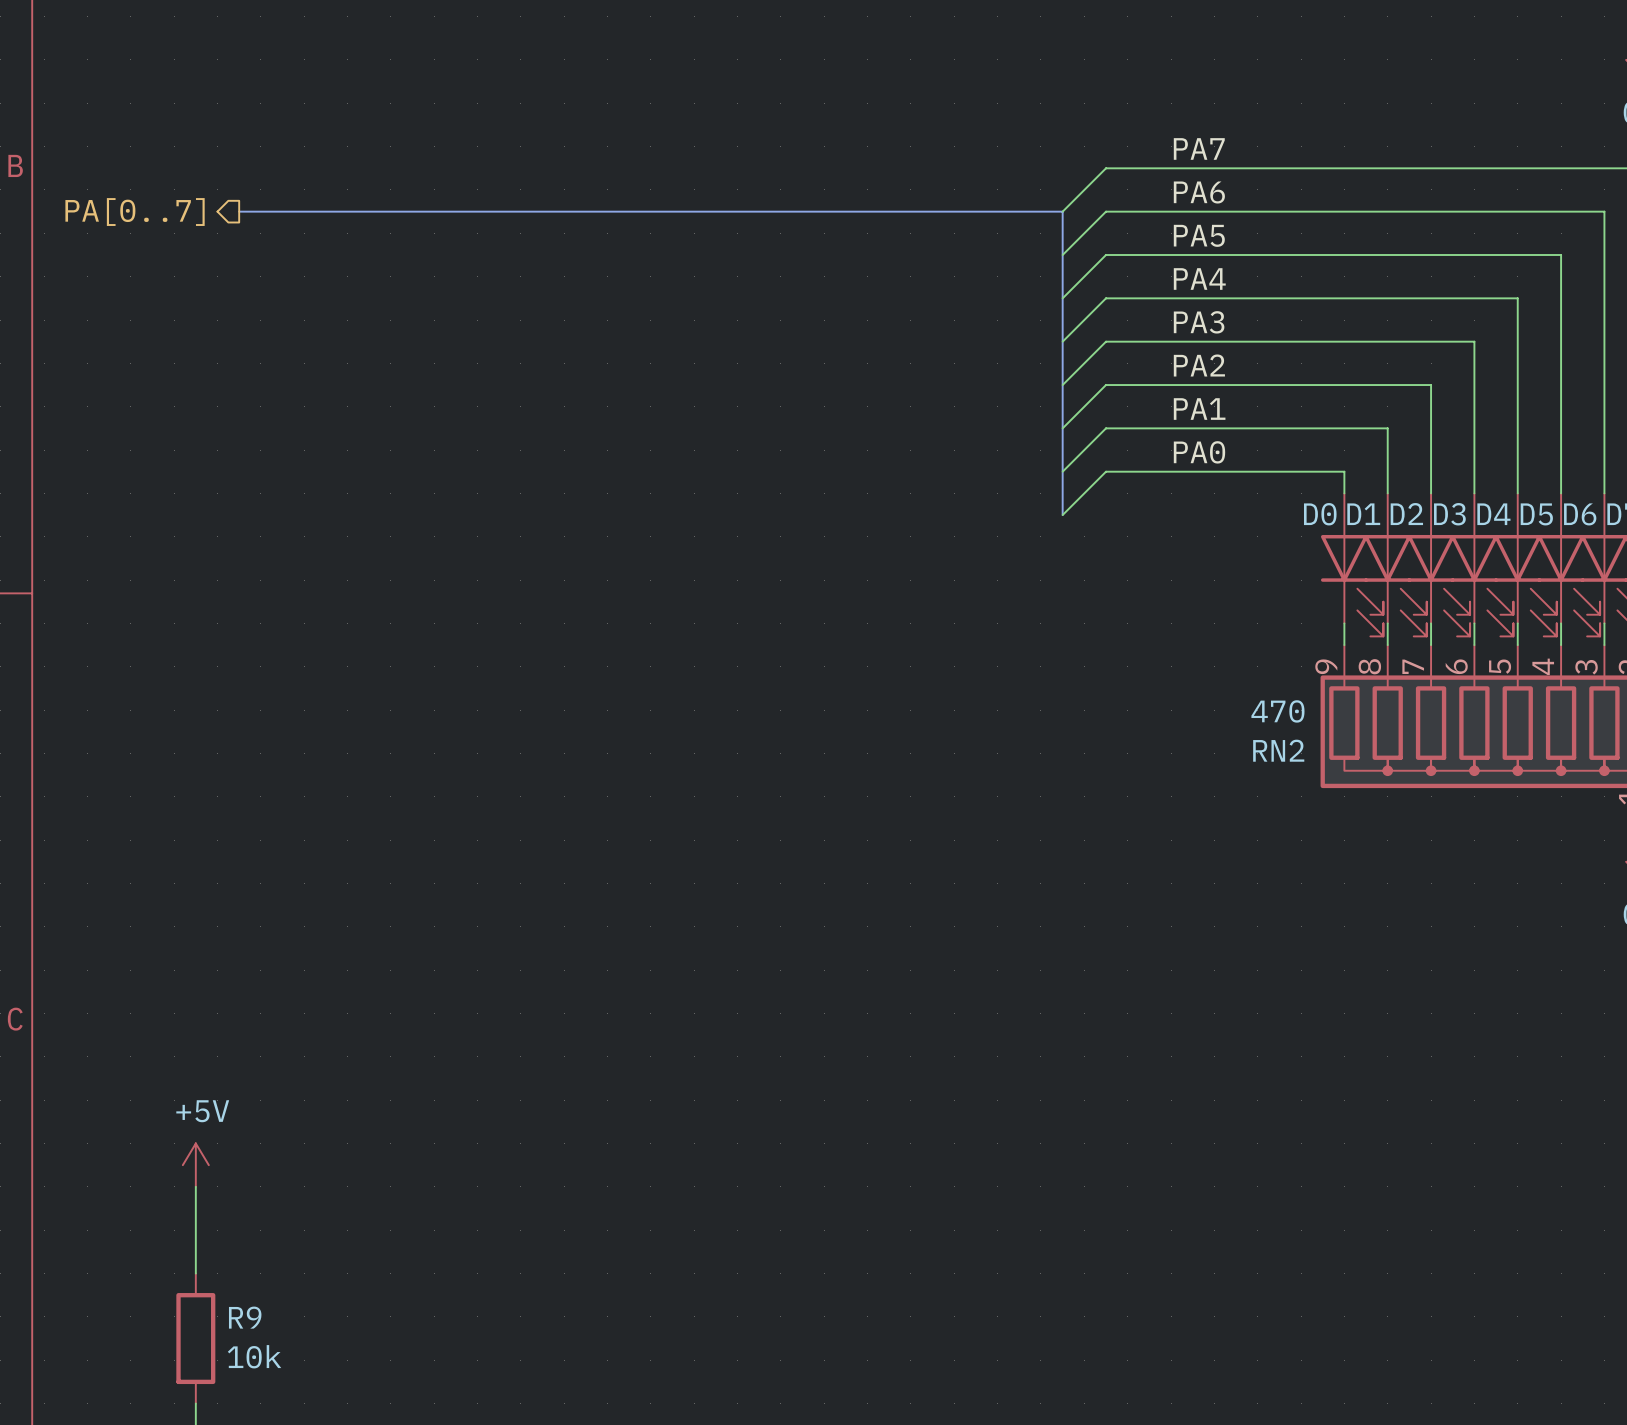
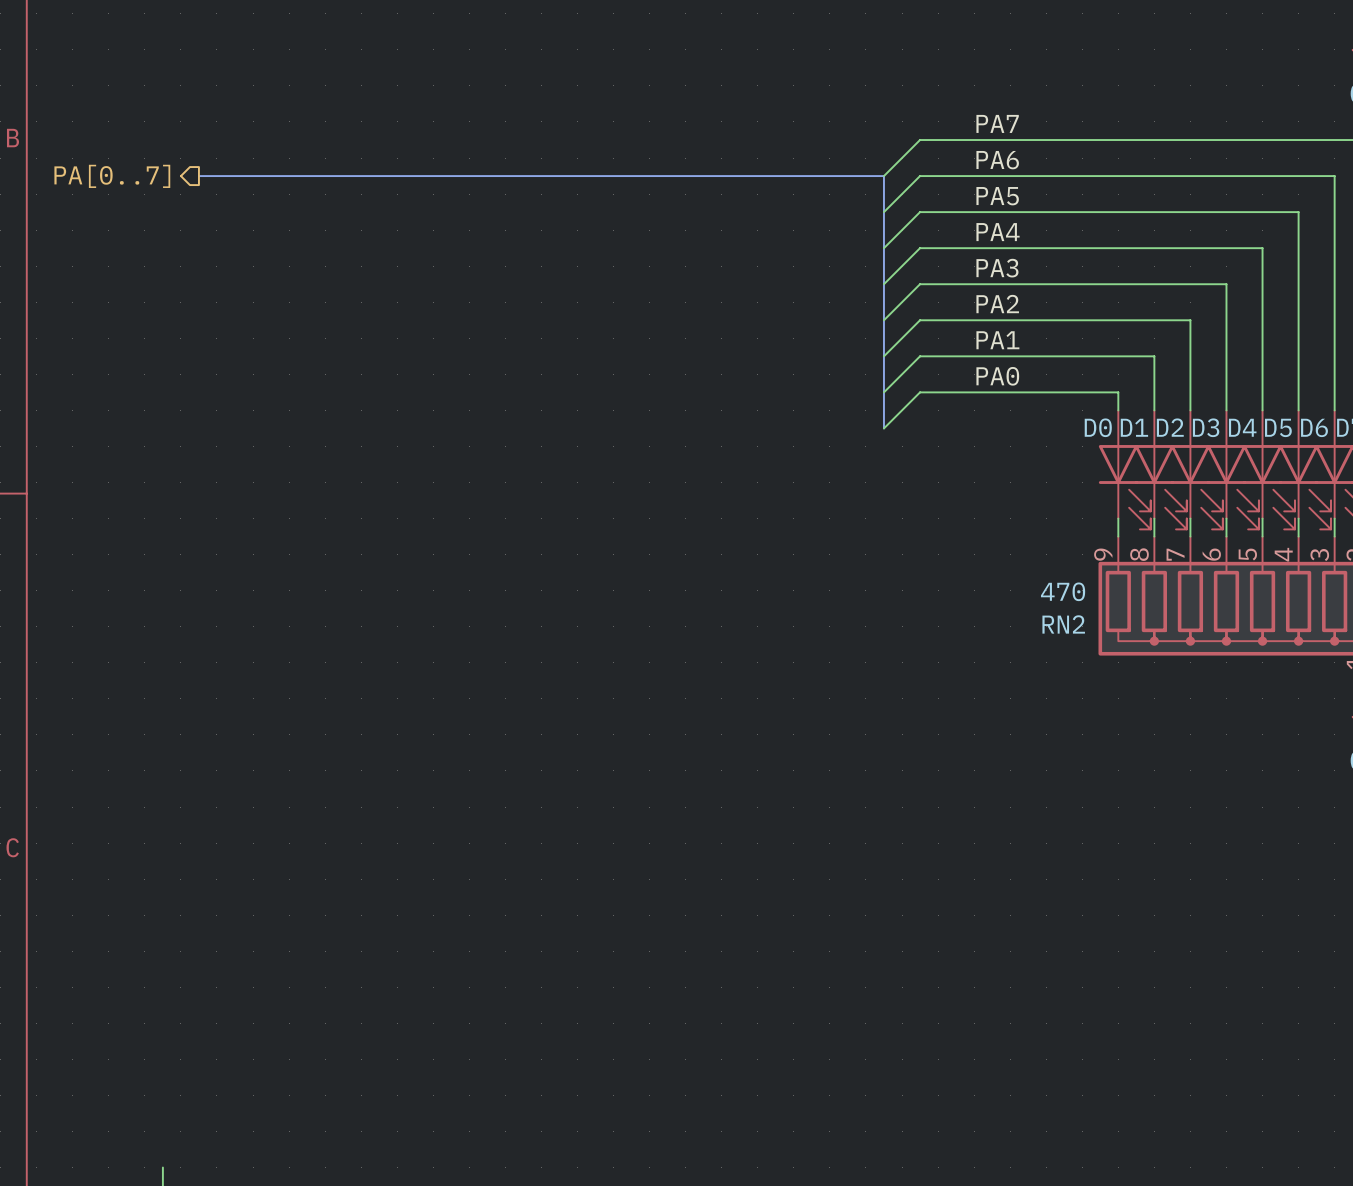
power symbol: +5V (195, 1165) -> none
wire: (195, 1186) (195, 1273) -> none
R9: 10k (195, 1338) -> none

